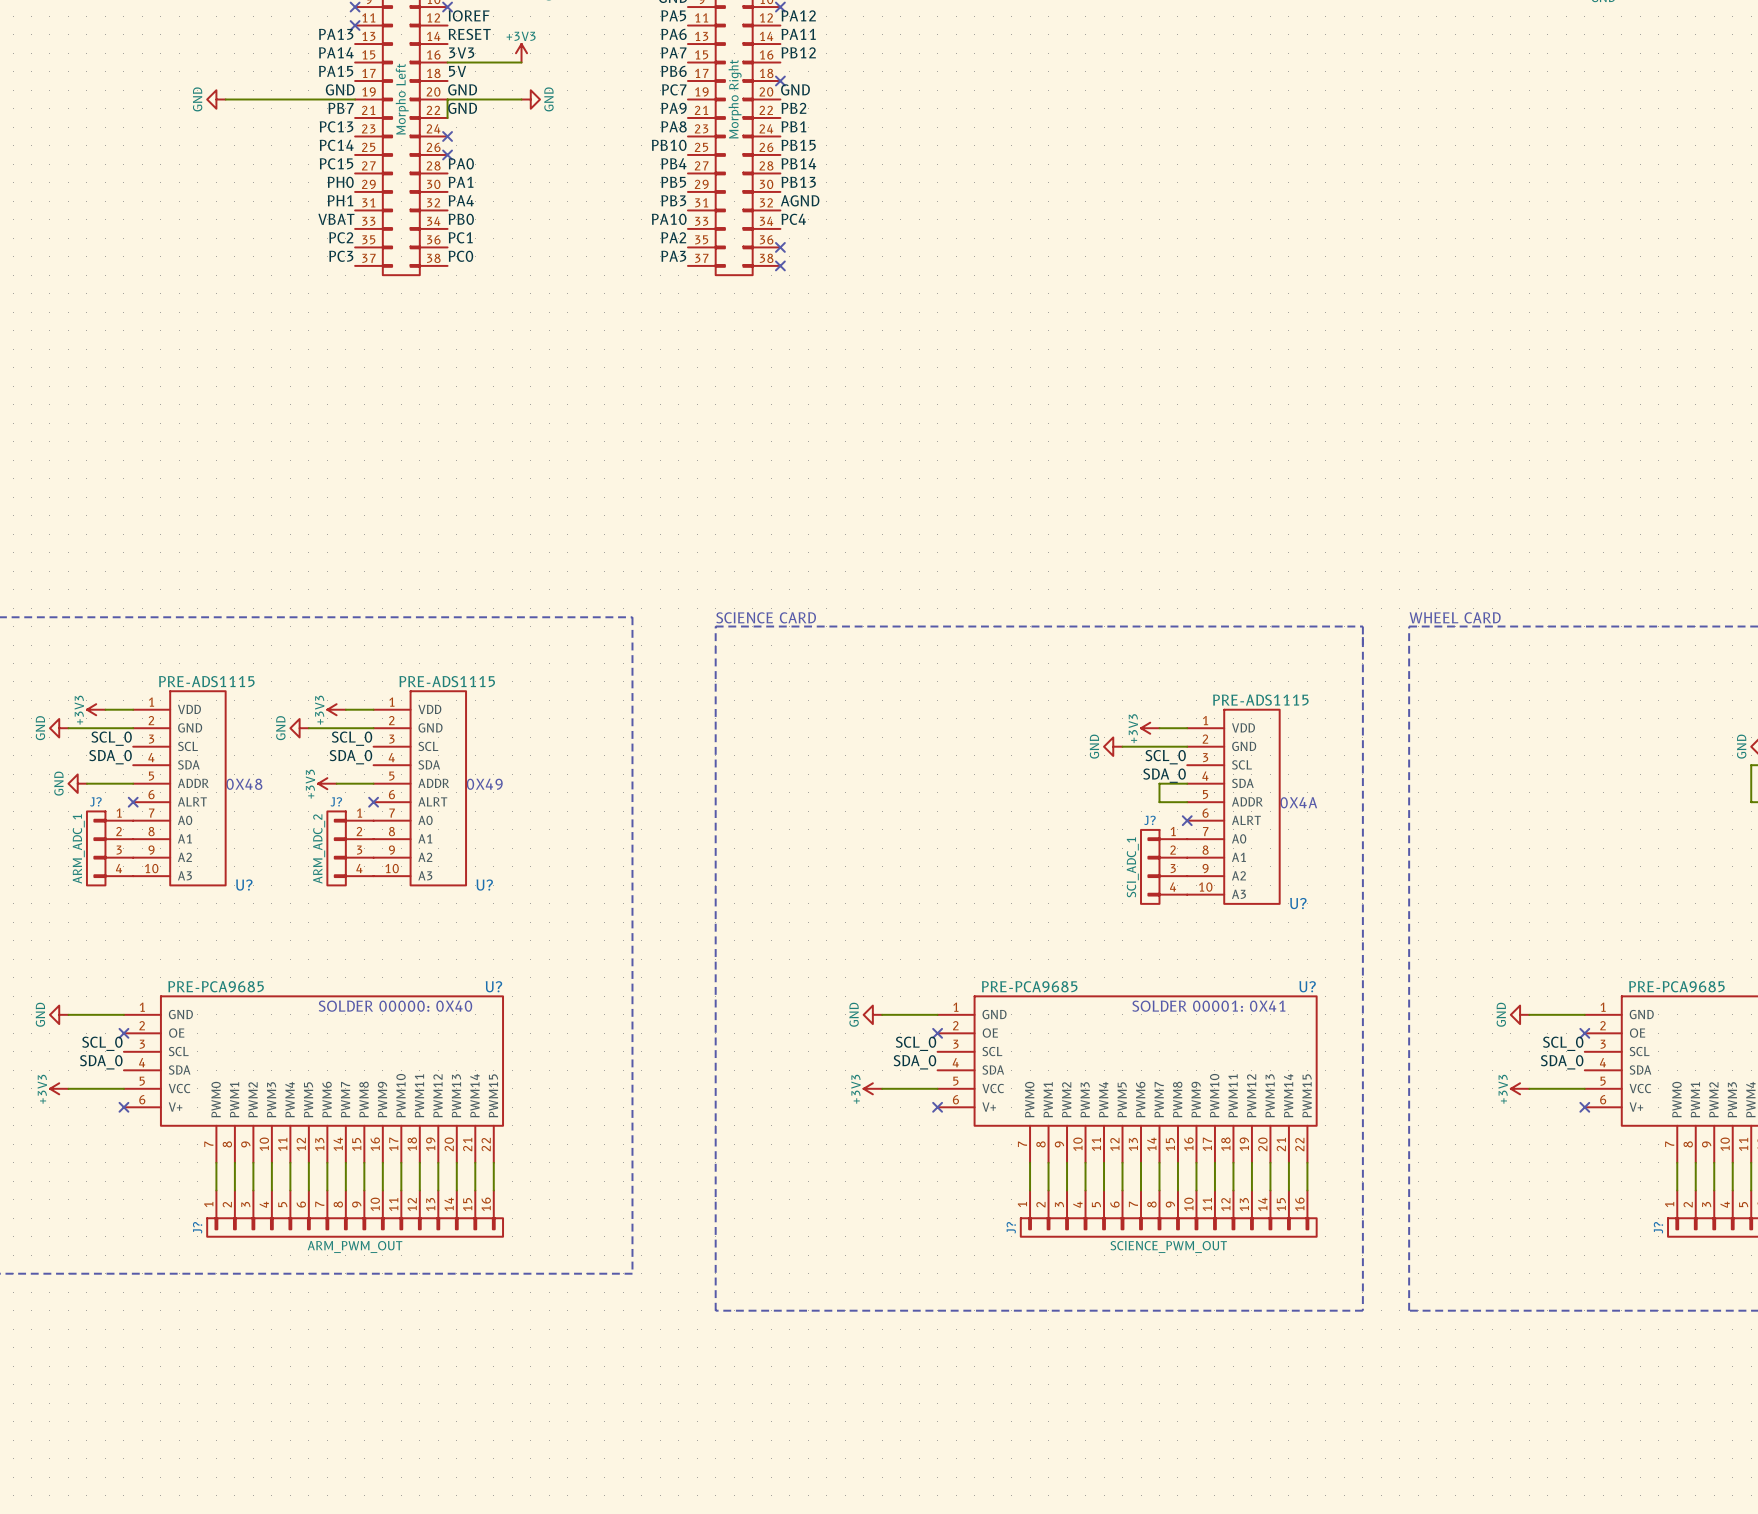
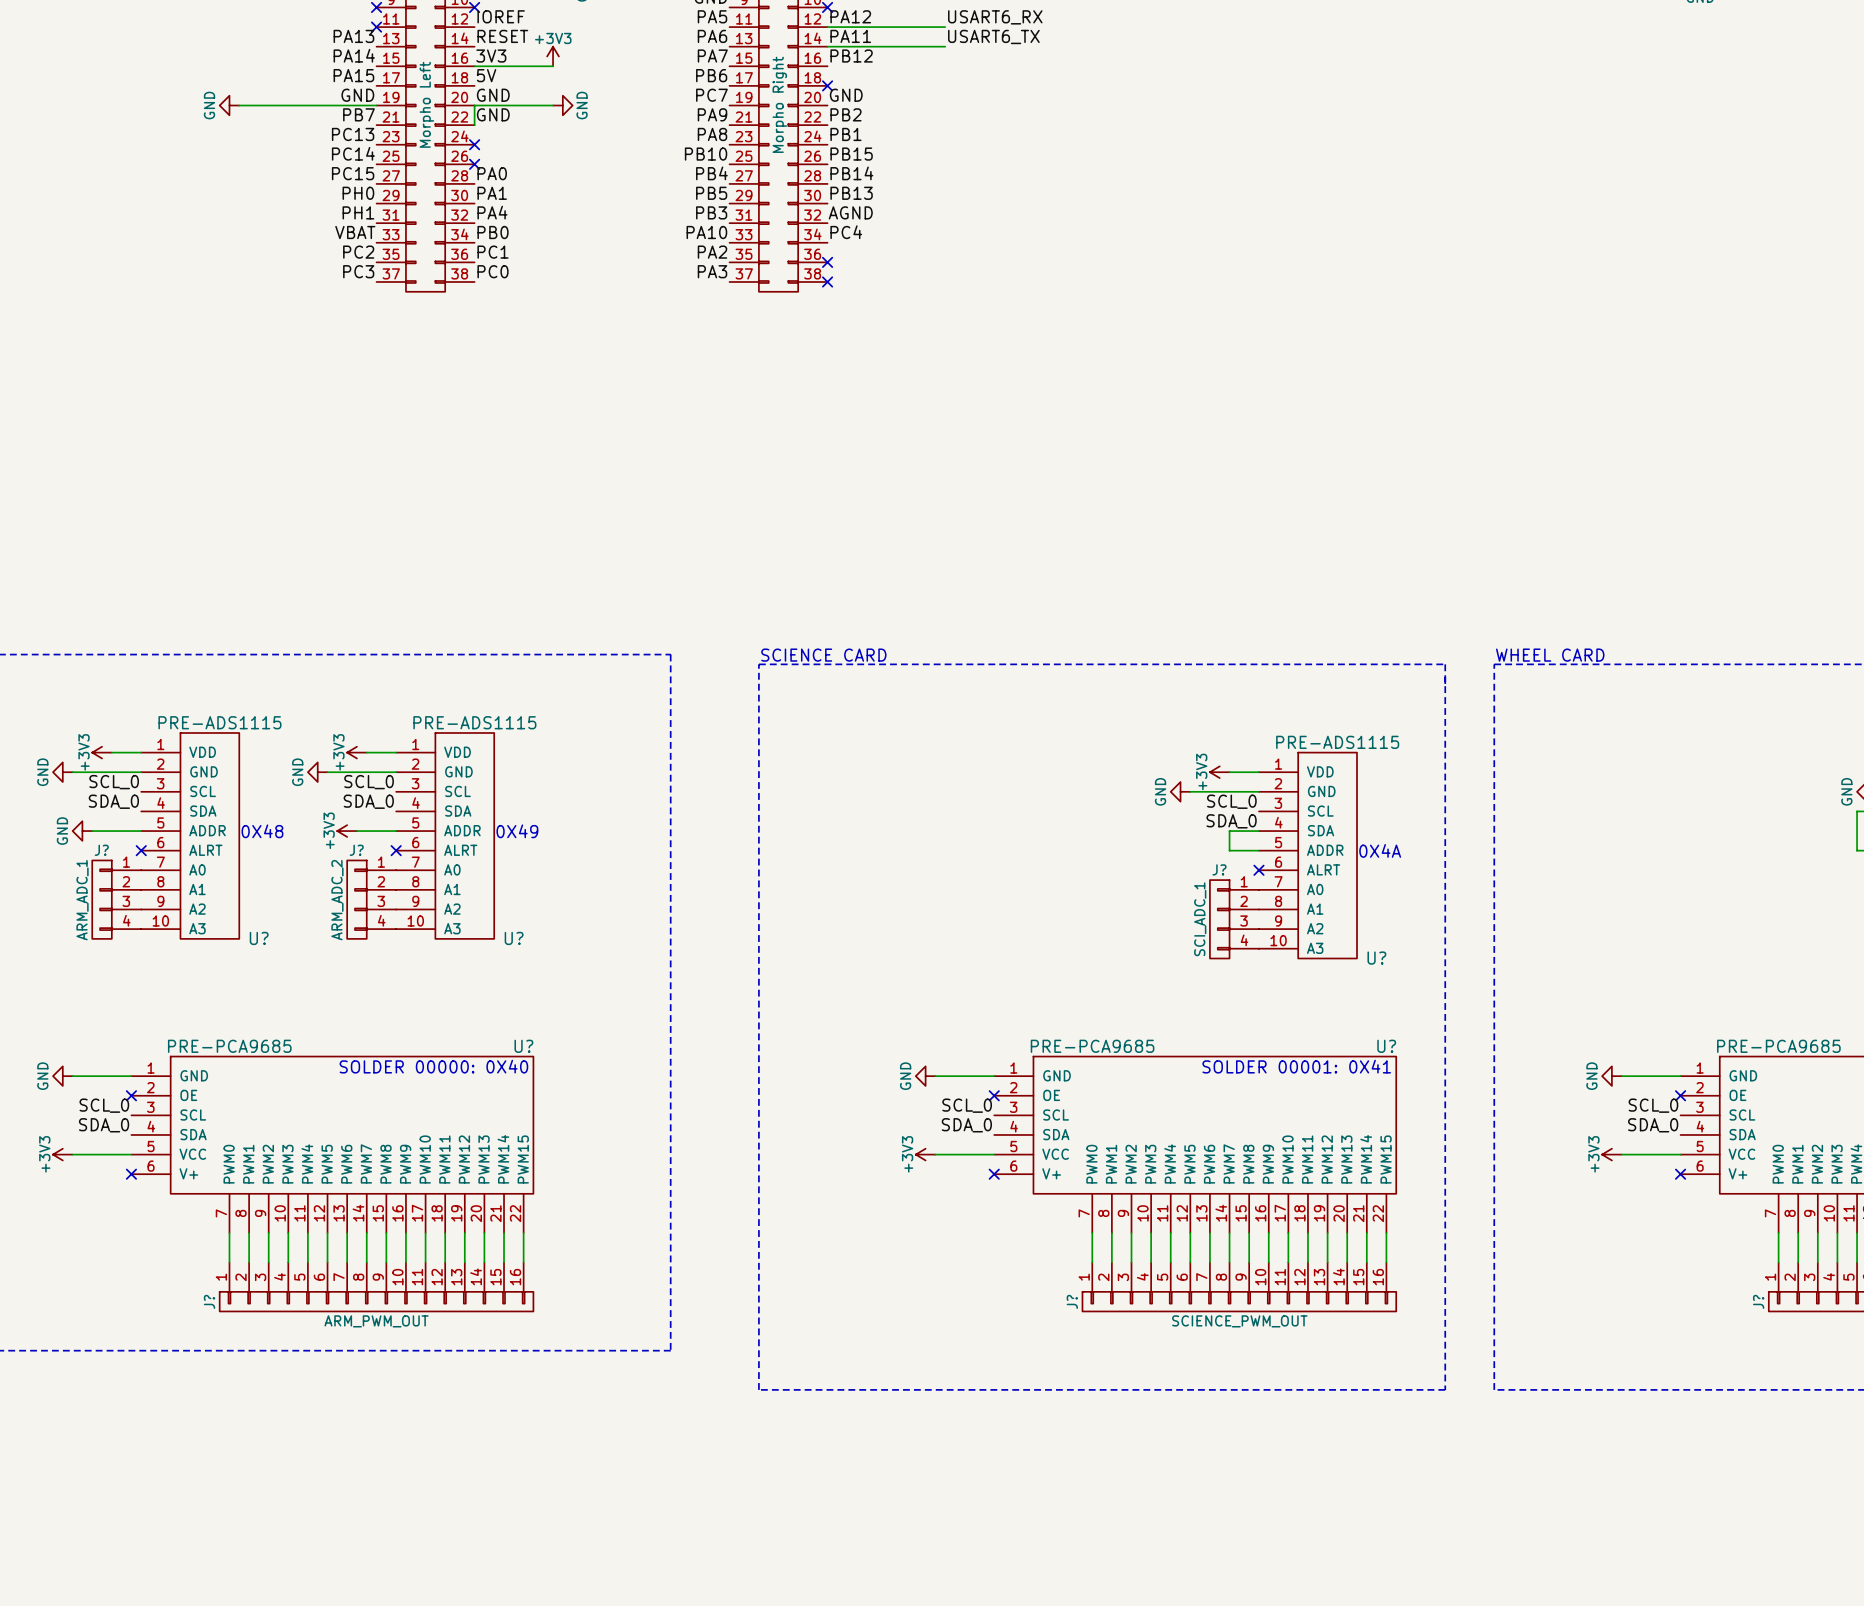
label: none -> USART6_RX (995, 17)
wire: none -> (827, 27) (945, 27)
label: none -> USART6_TX (993, 36)
wire: none -> (827, 46) (945, 46)

